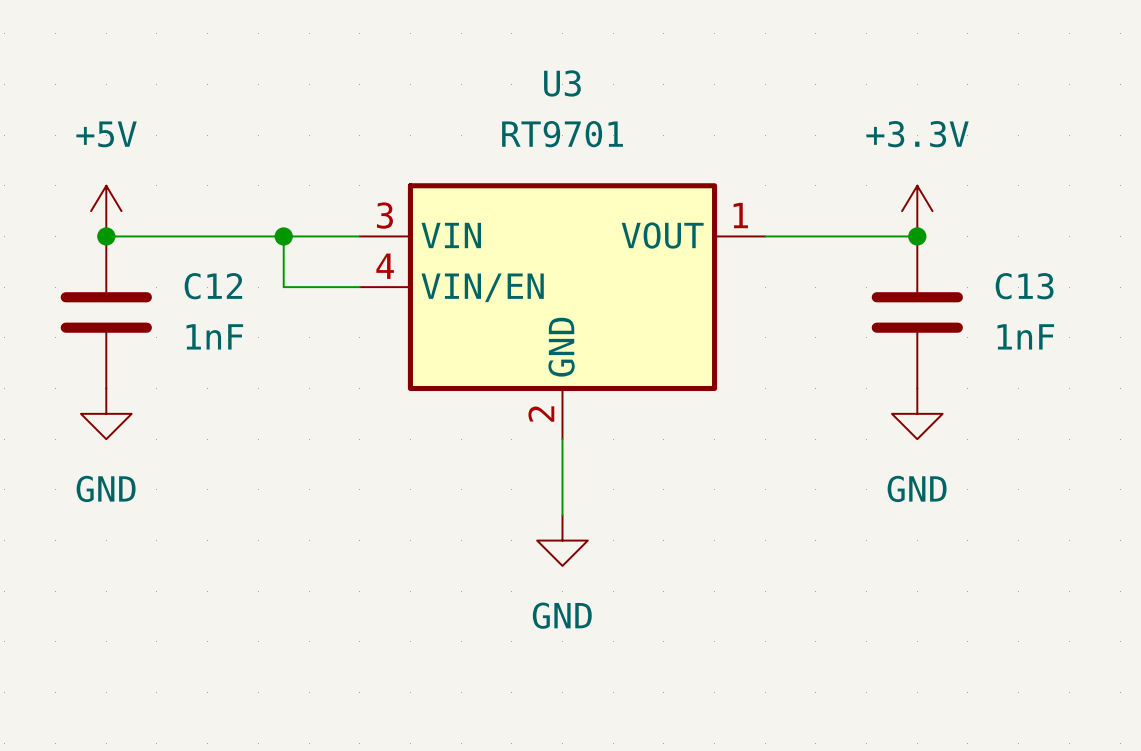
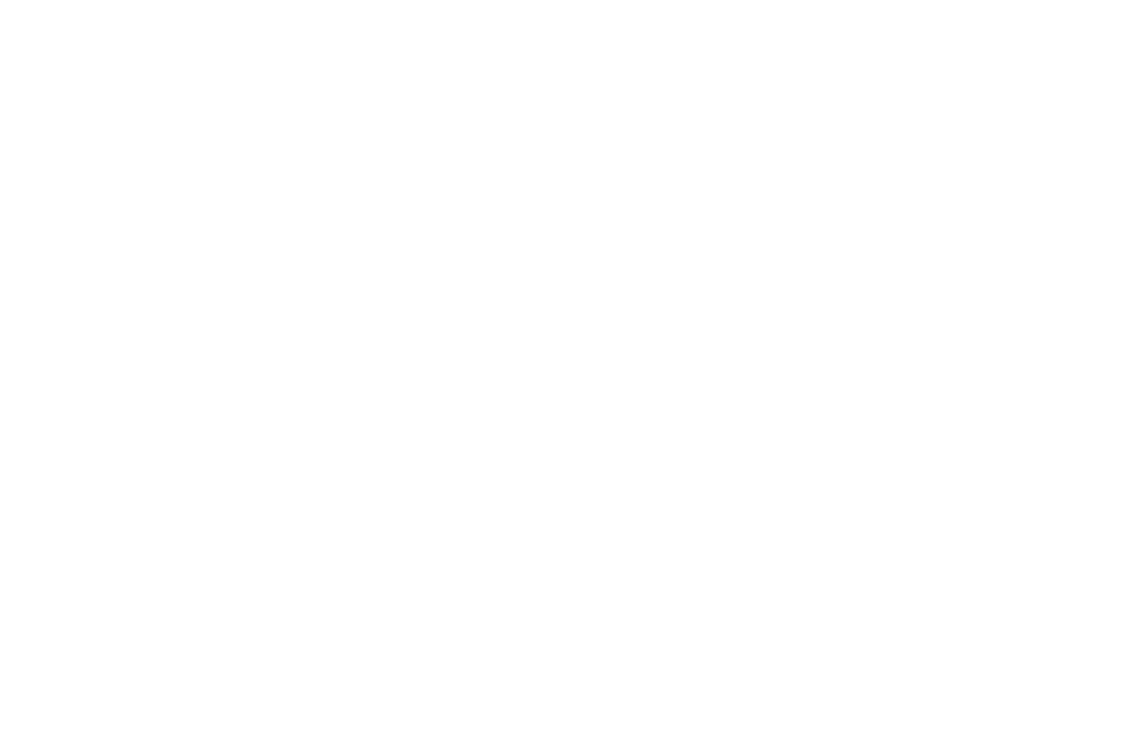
power symbol: +5V (106, 211) -> none
power symbol: +3.3V (917, 211) -> none
wire: (106, 236) (359, 236) -> none
junction: (106, 236) -> none
wire: (283, 236) (283, 287) (359, 287) -> none
junction: (283, 236) -> none
wire: (765, 236) (917, 236) -> none
junction: (917, 236) -> none
U3: RT9701 (562, 311) -> none
C12: 1nF (106, 312) -> none
C13: 1nF (917, 312) -> none
power symbol: GND (106, 413) -> none
power symbol: GND (917, 413) -> none
wire: (562, 439) (562, 515) -> none
power symbol: GND (562, 540) -> none

